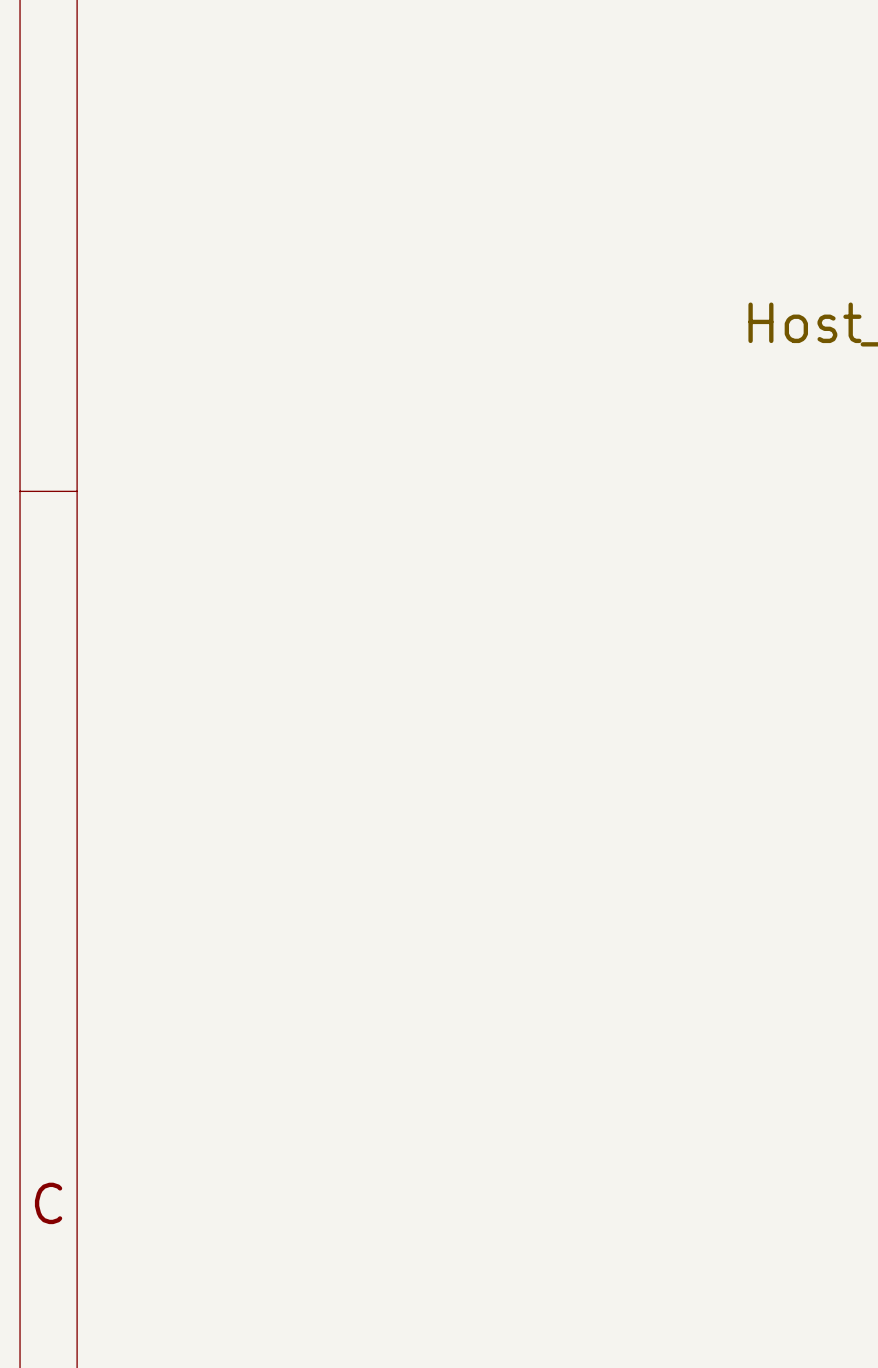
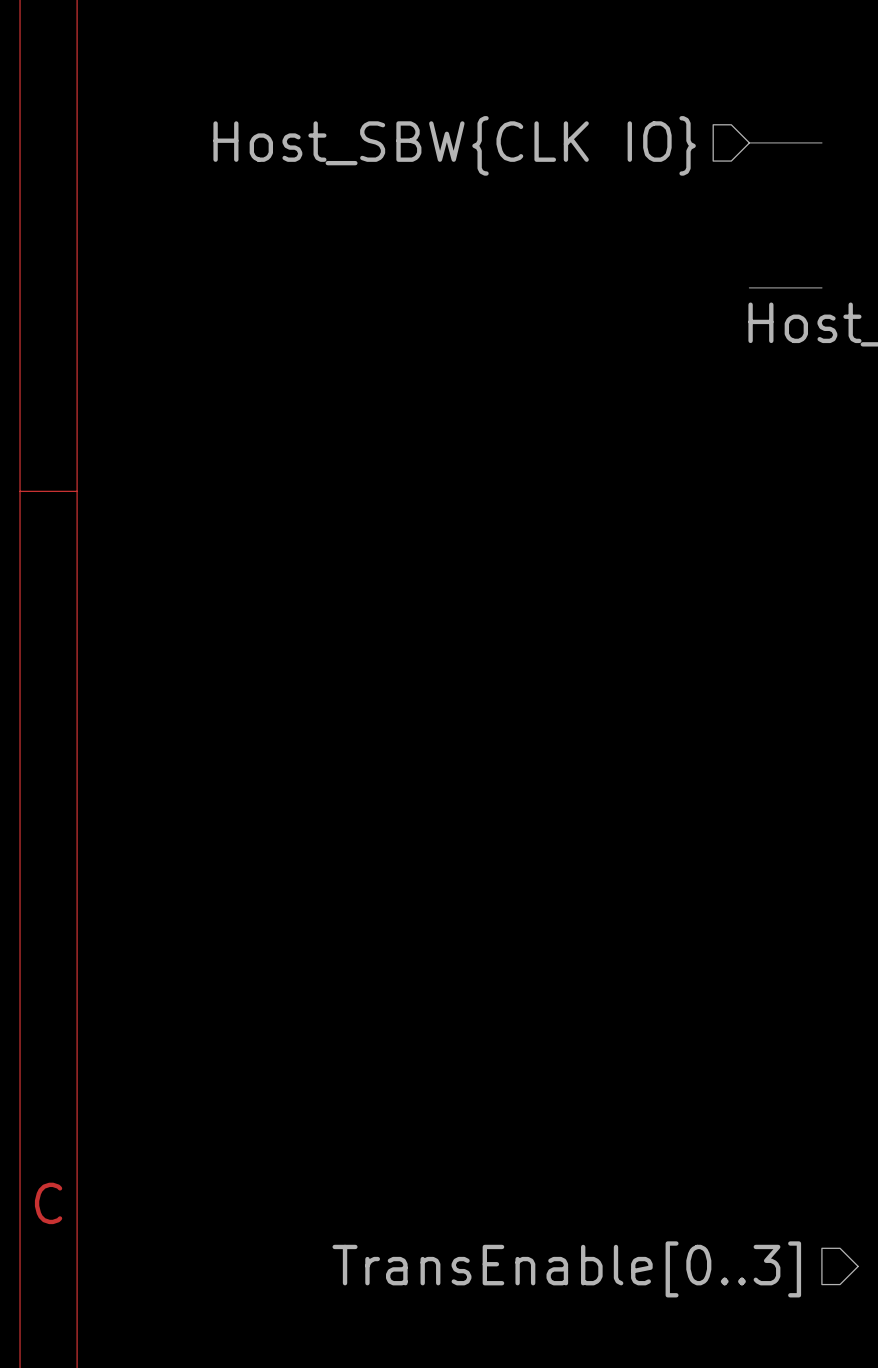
bus: none -> (749, 142) (821, 142)
hierarchical label: none -> Host_SBW{CLK IO} (454, 145)
bus: none -> (749, 287) (821, 287)
hierarchical label: none -> TransEnable[0..3] (566, 1269)

